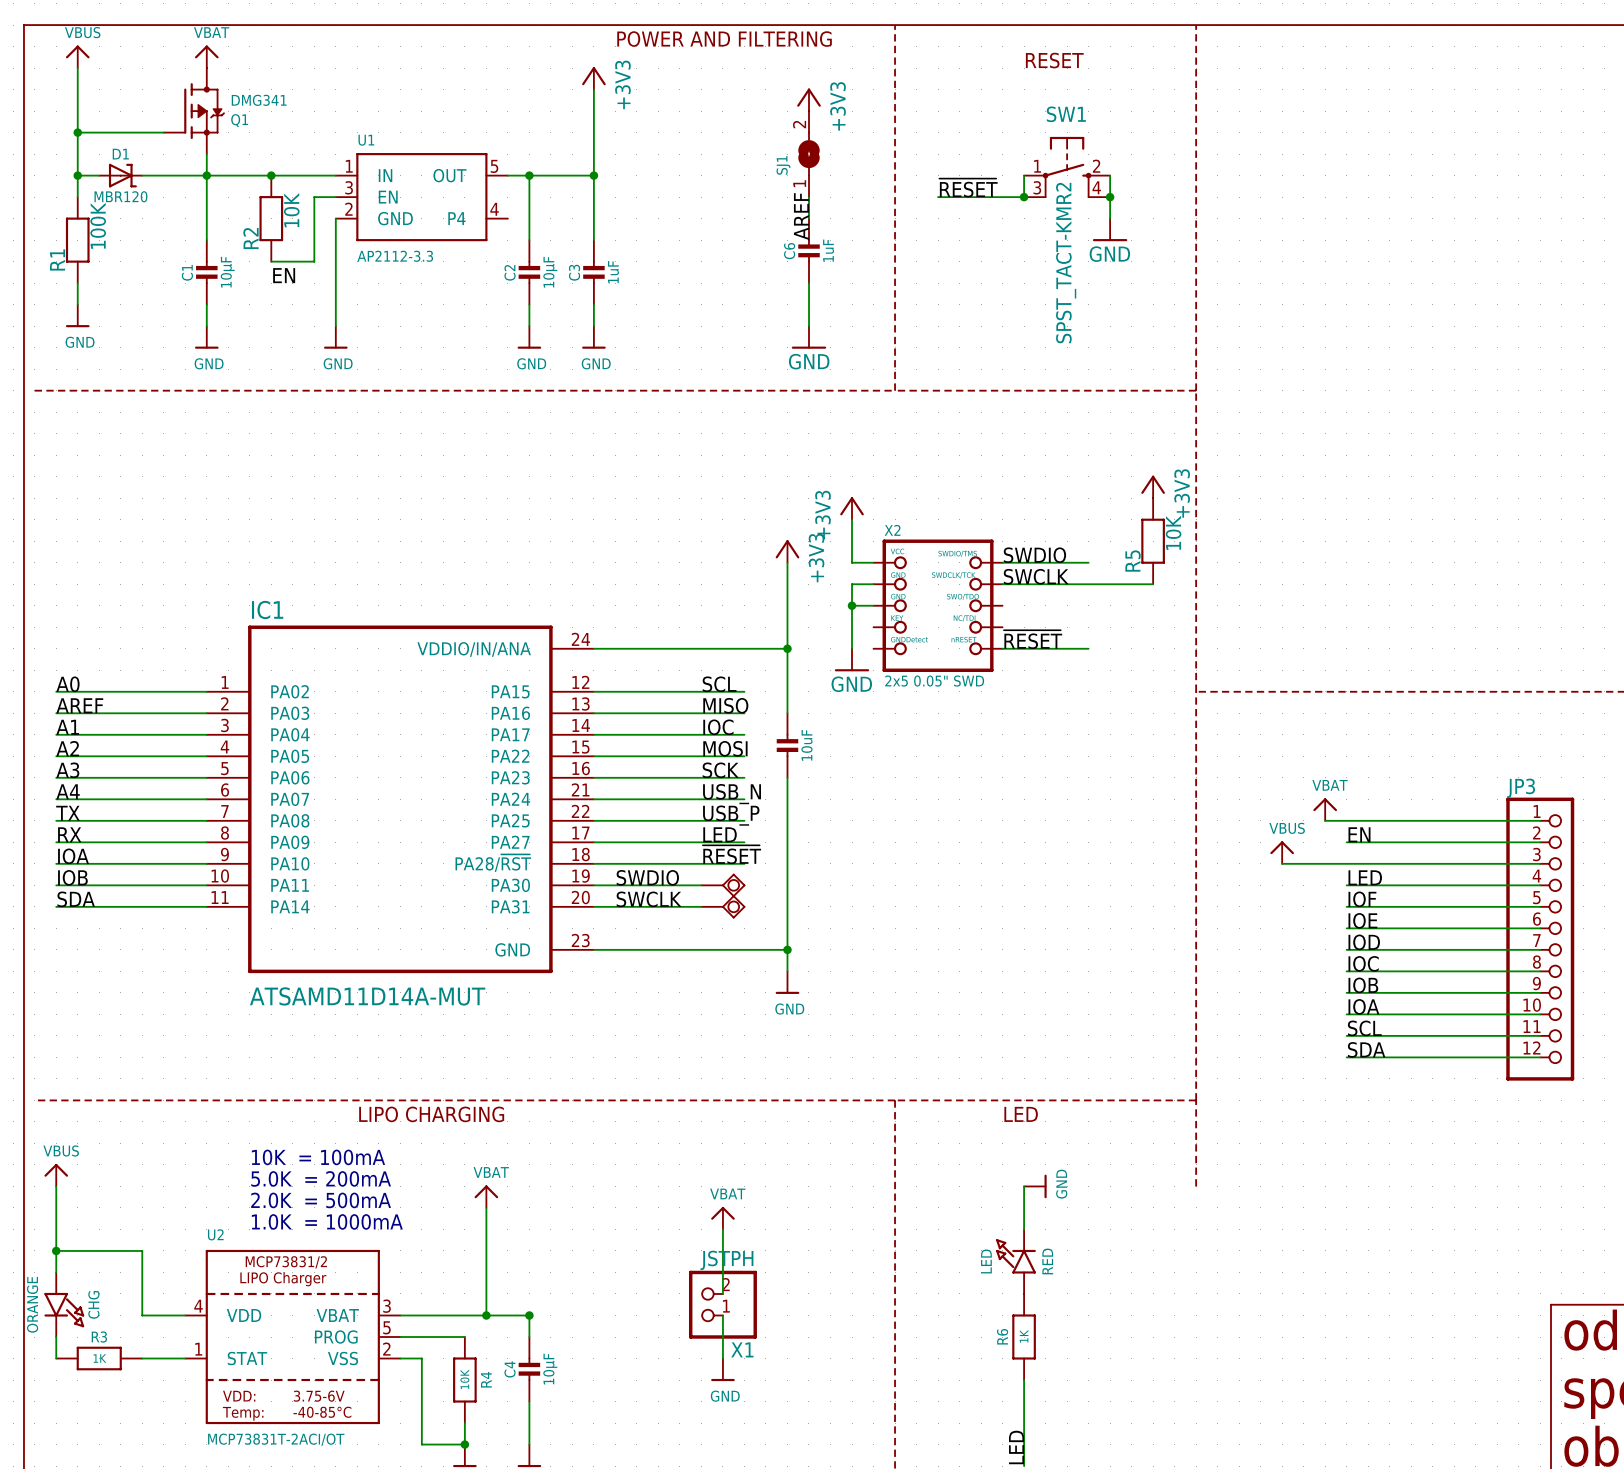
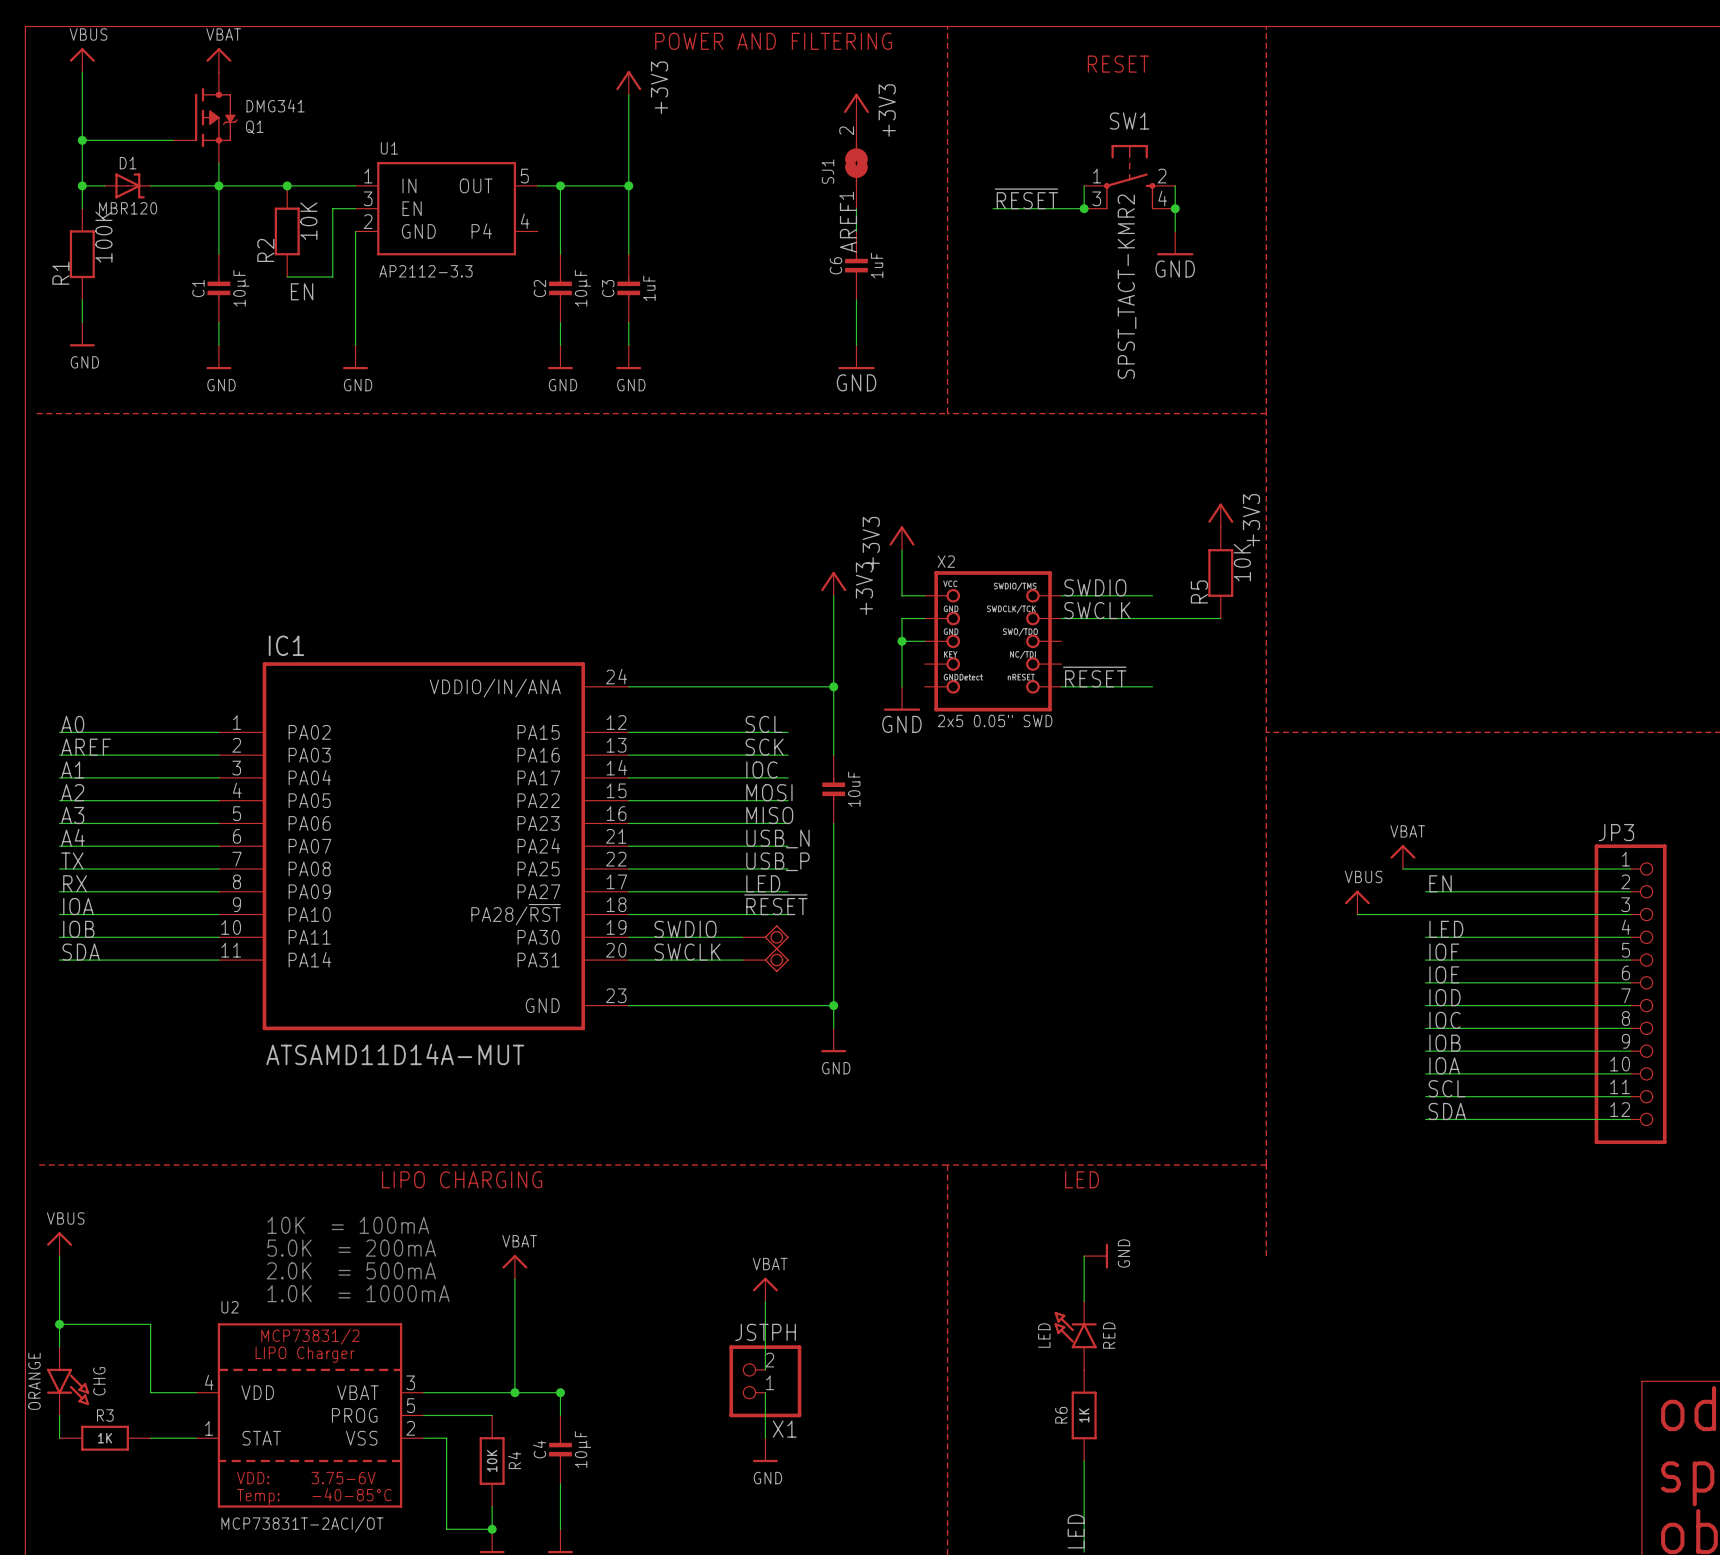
label: MISO (725, 705) -> SCK (764, 747)
label: SCK (720, 770) -> MISO (769, 815)

